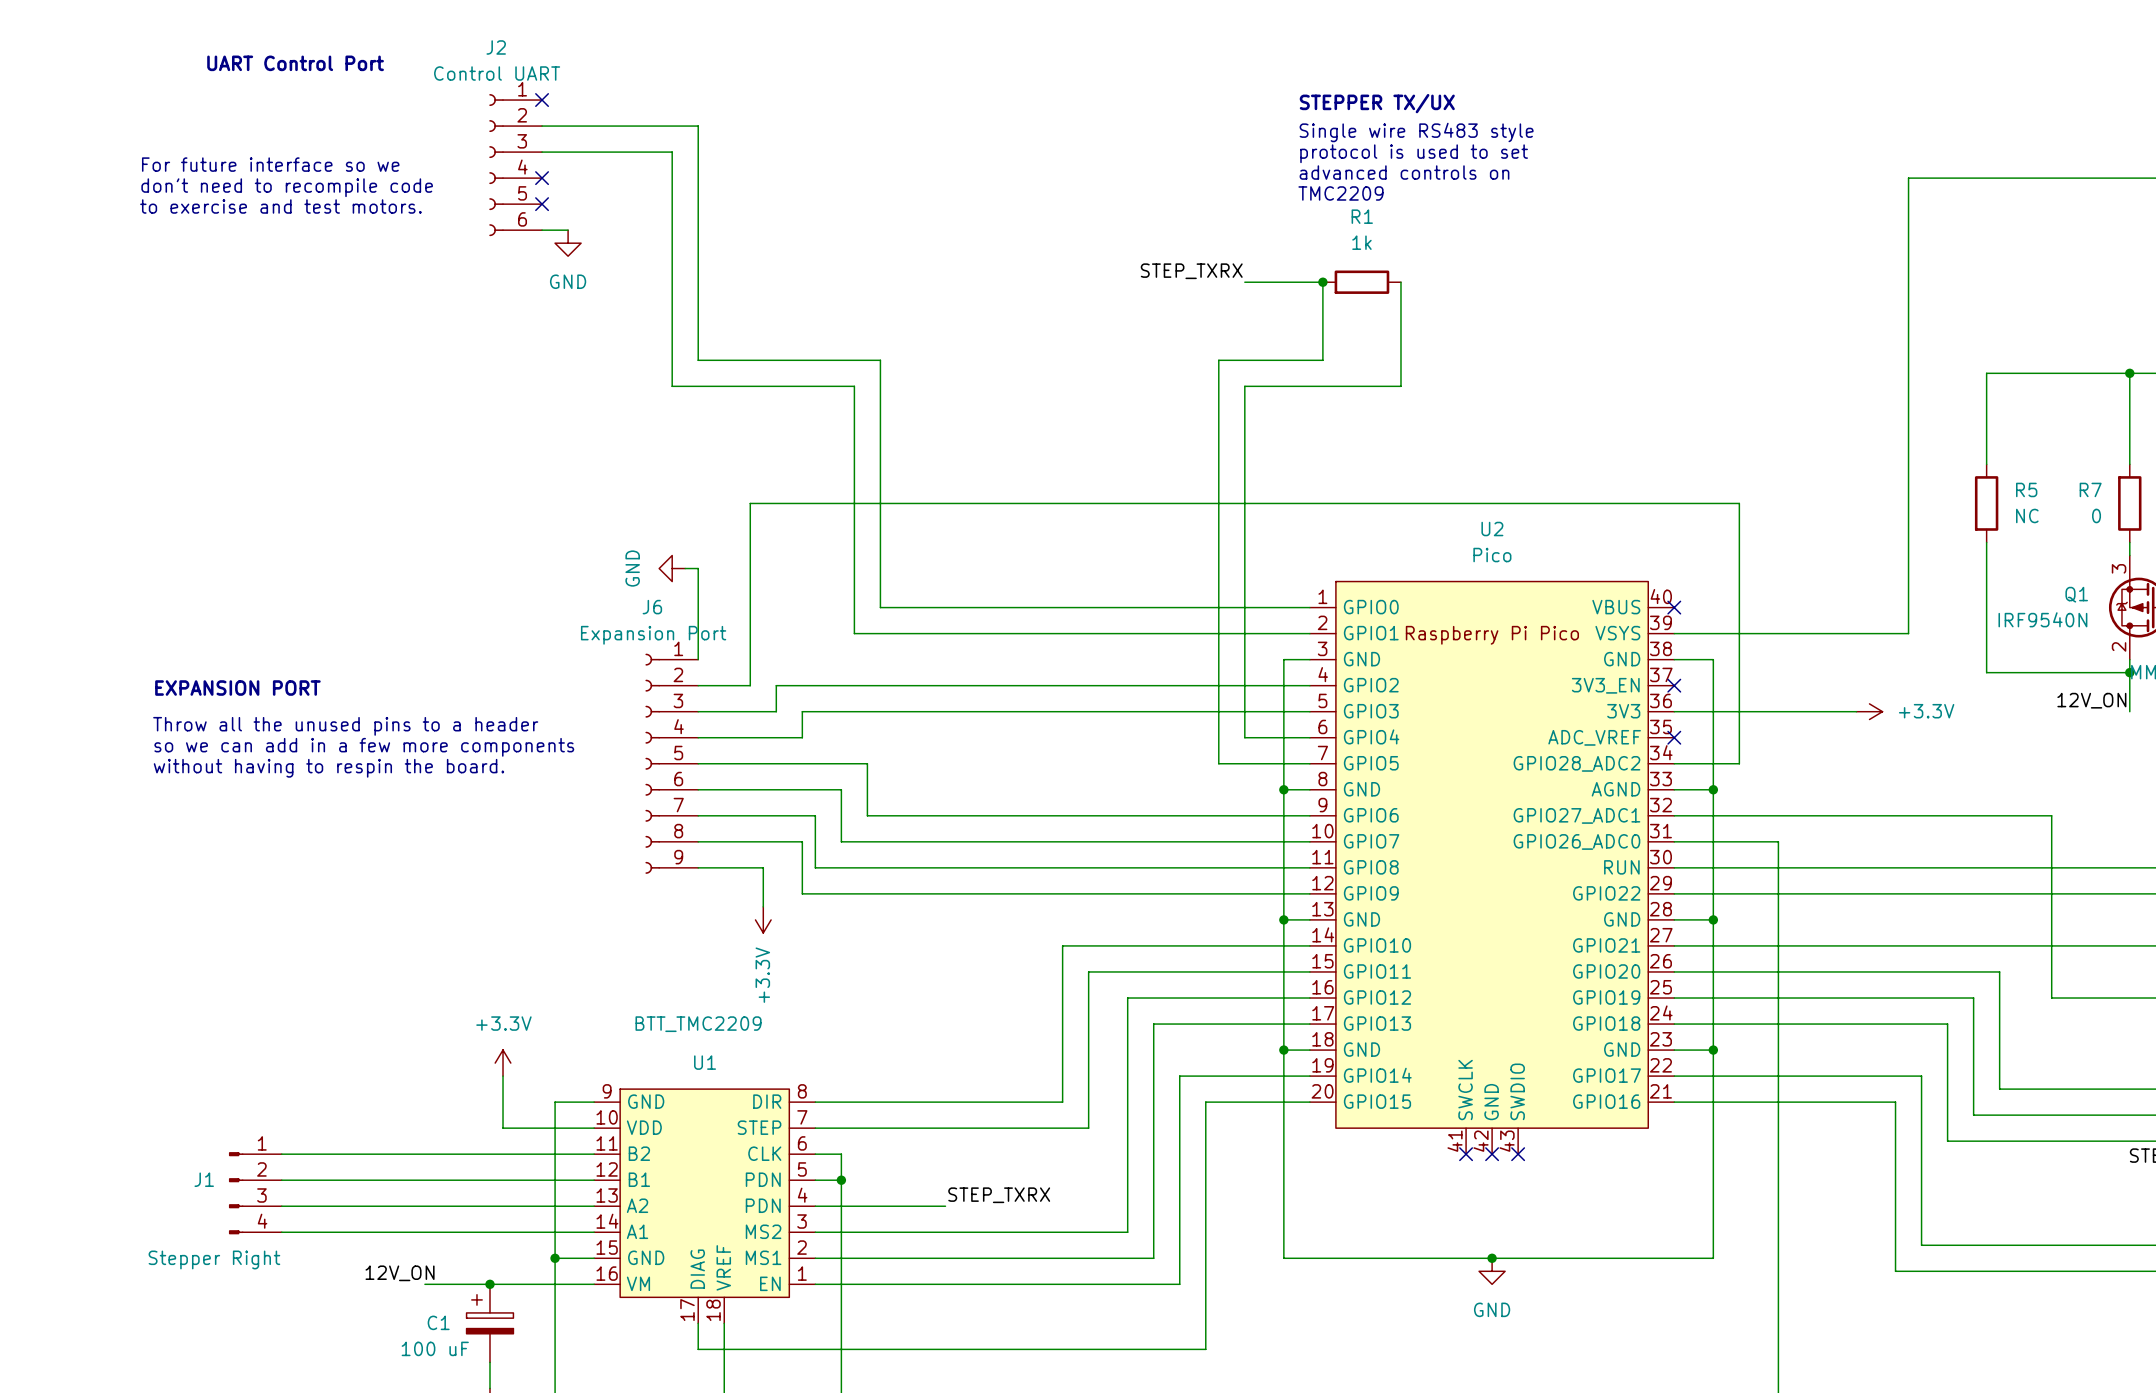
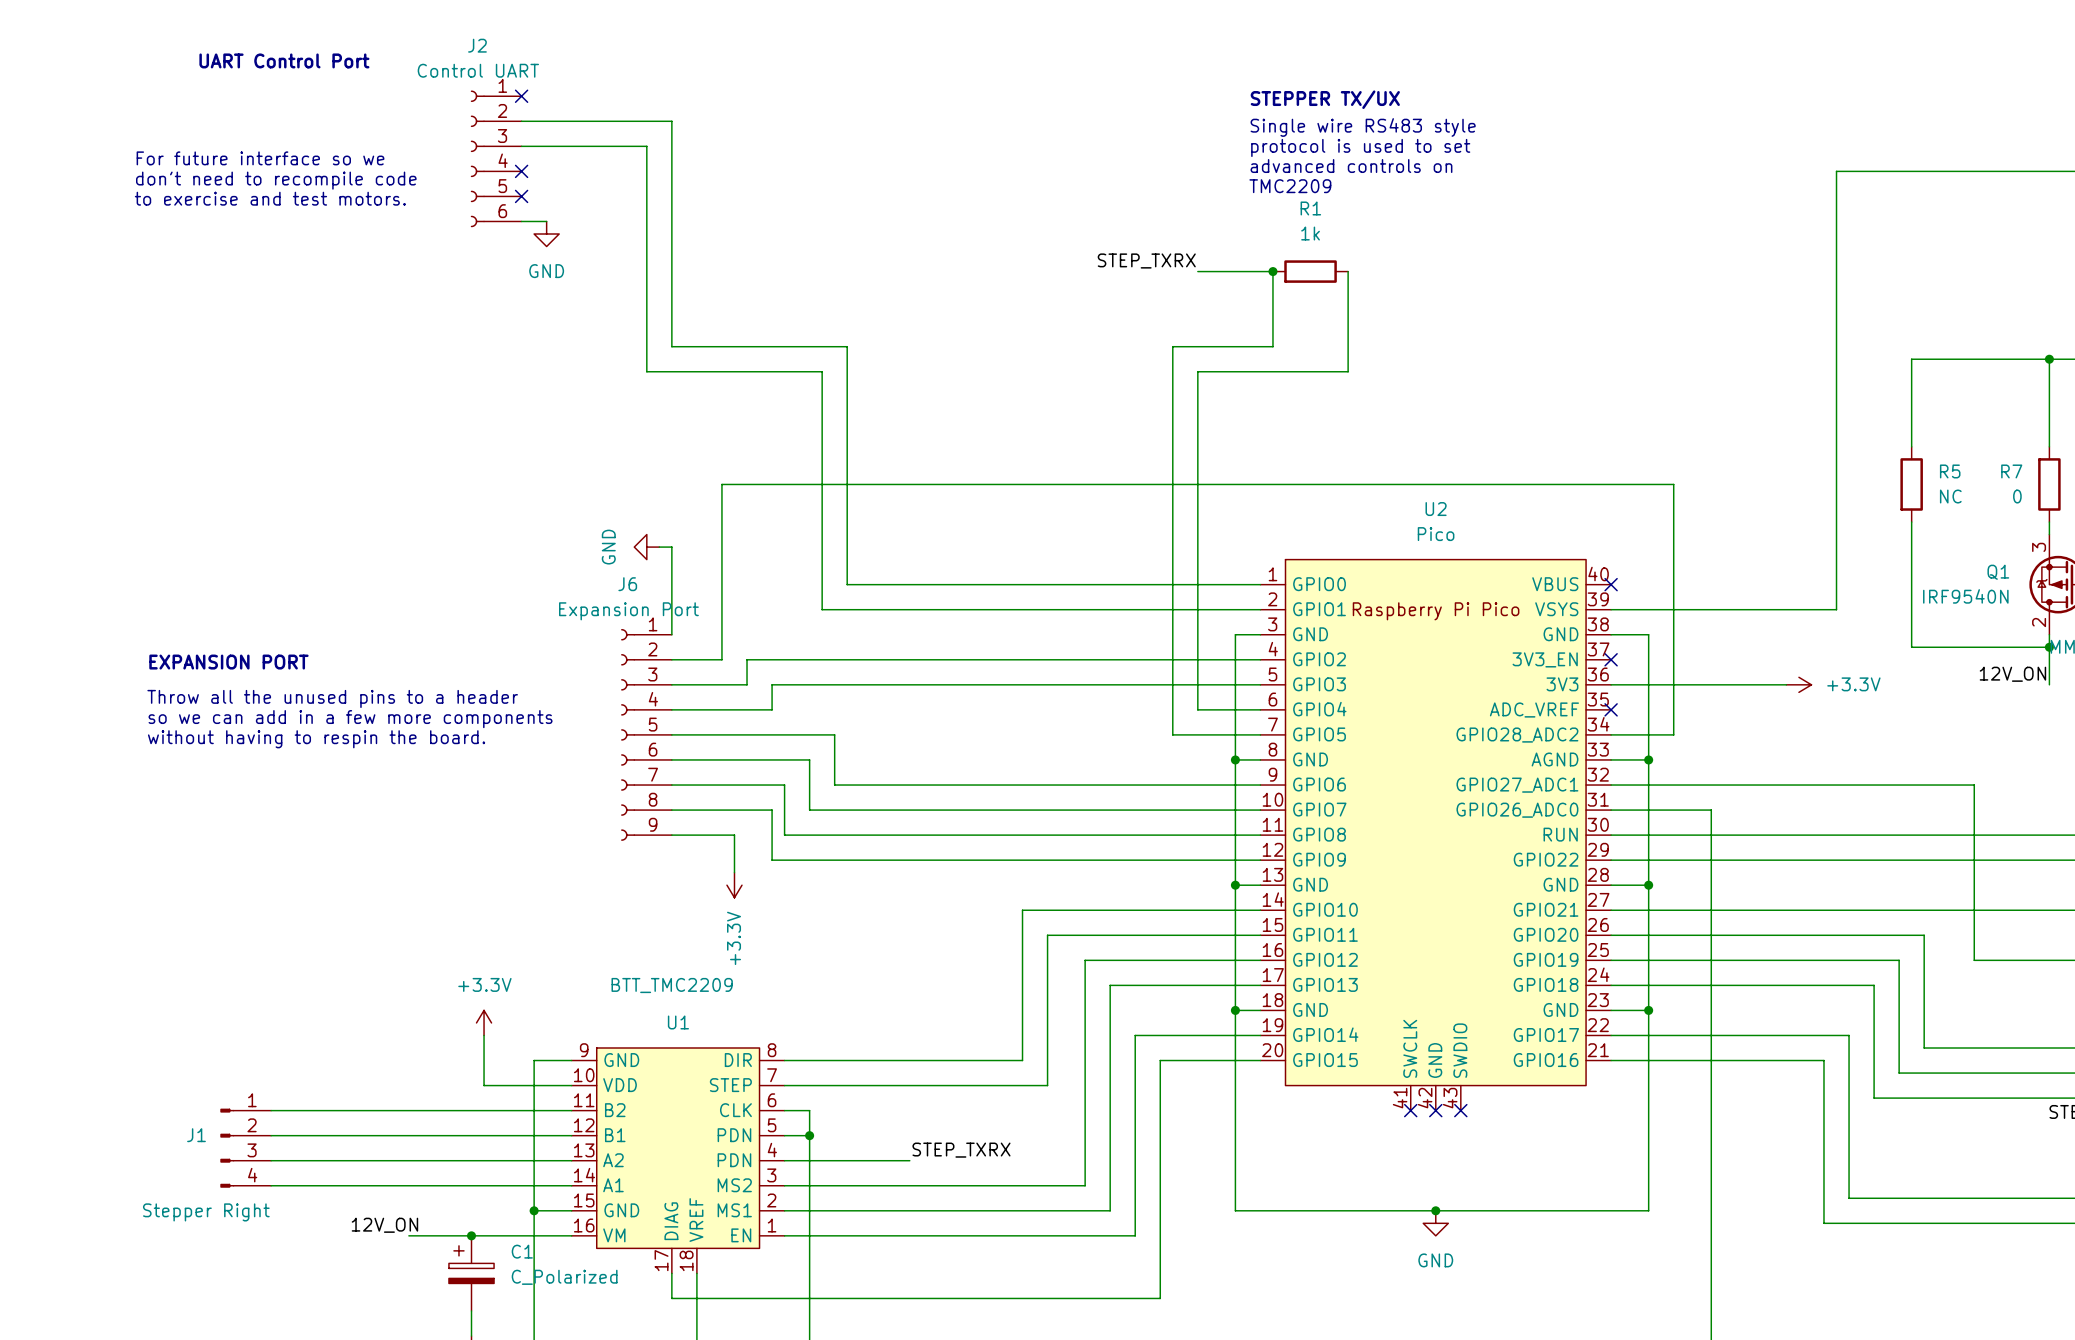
C1 name position: C1 (438, 1322) -> C1 (522, 1251)
C1 value: 100 uF (435, 1348) -> C_Polarized (564, 1277)

